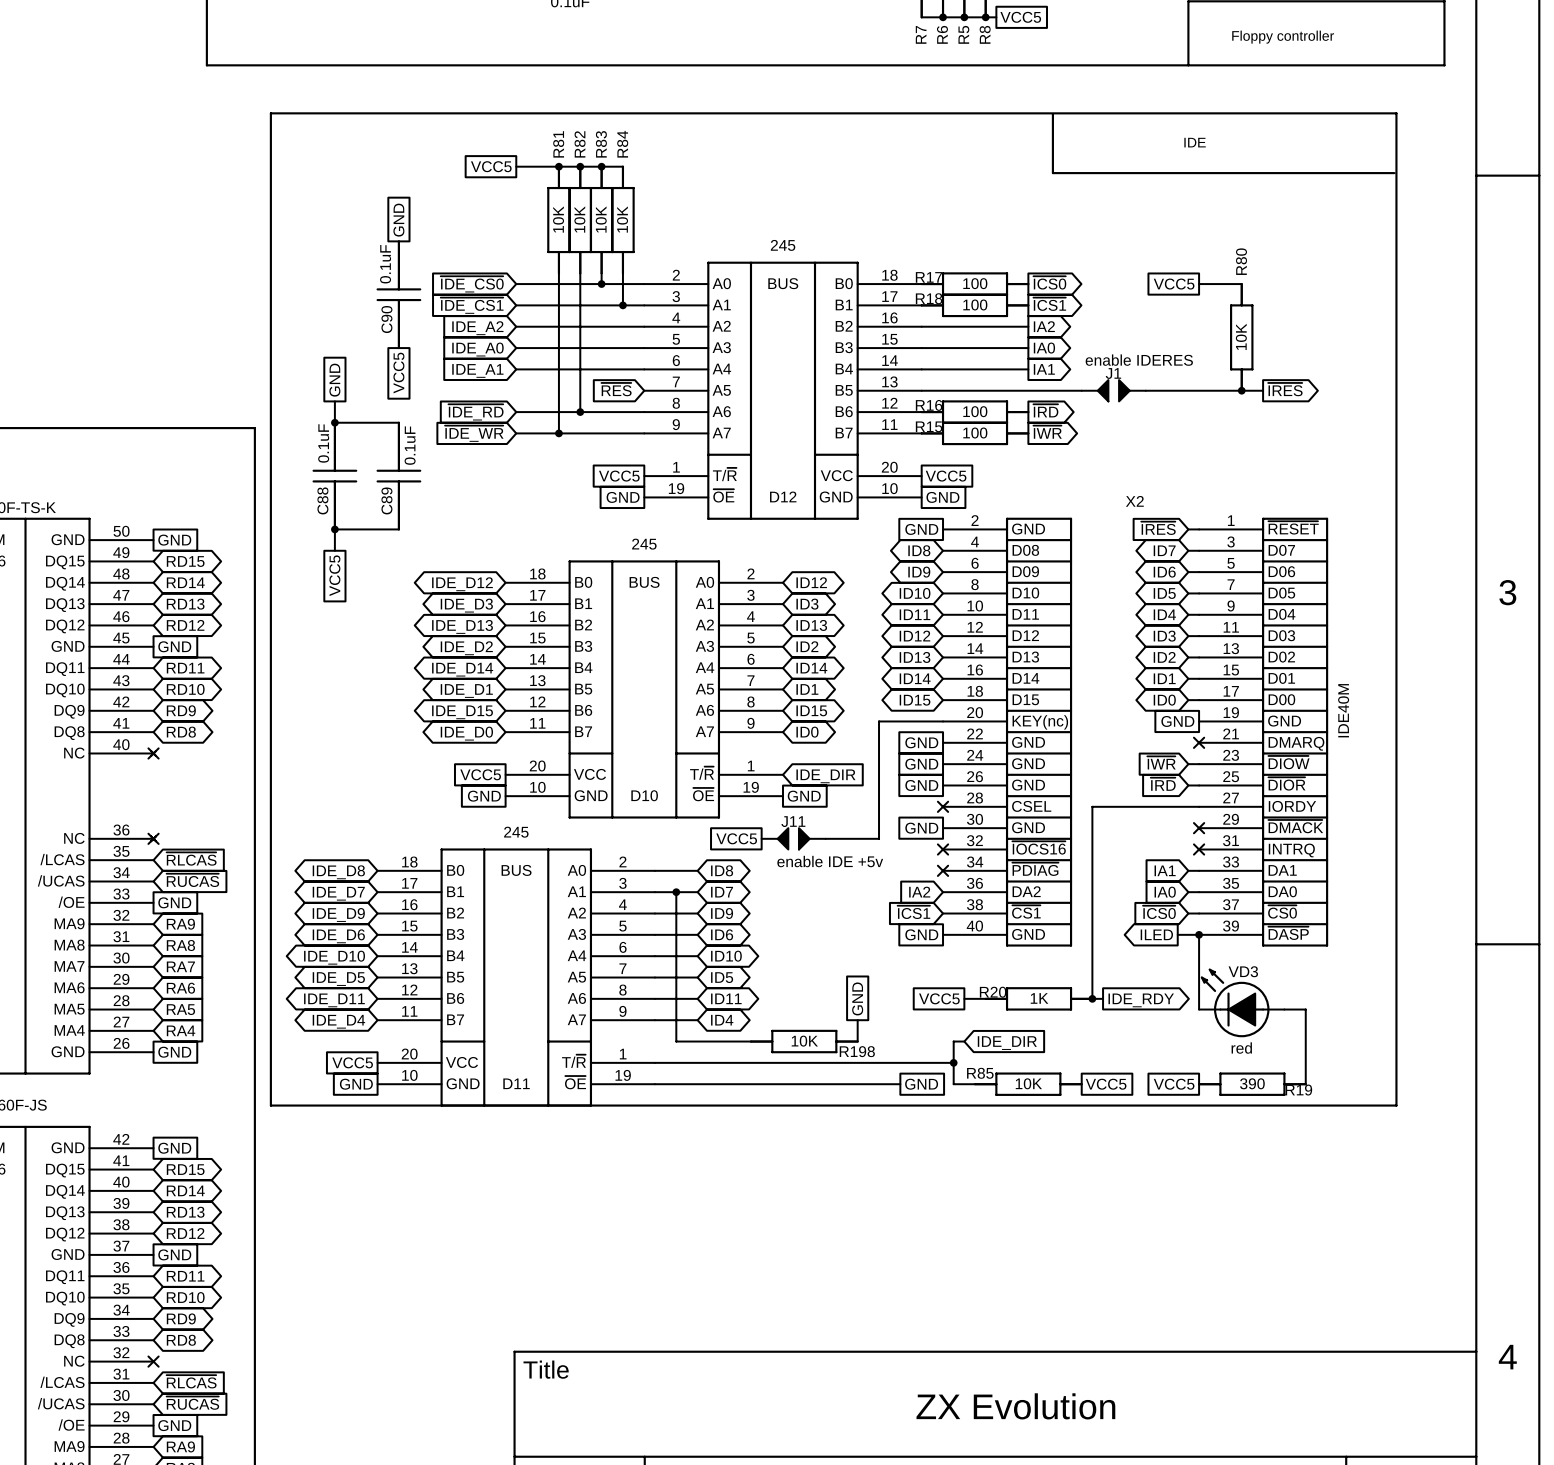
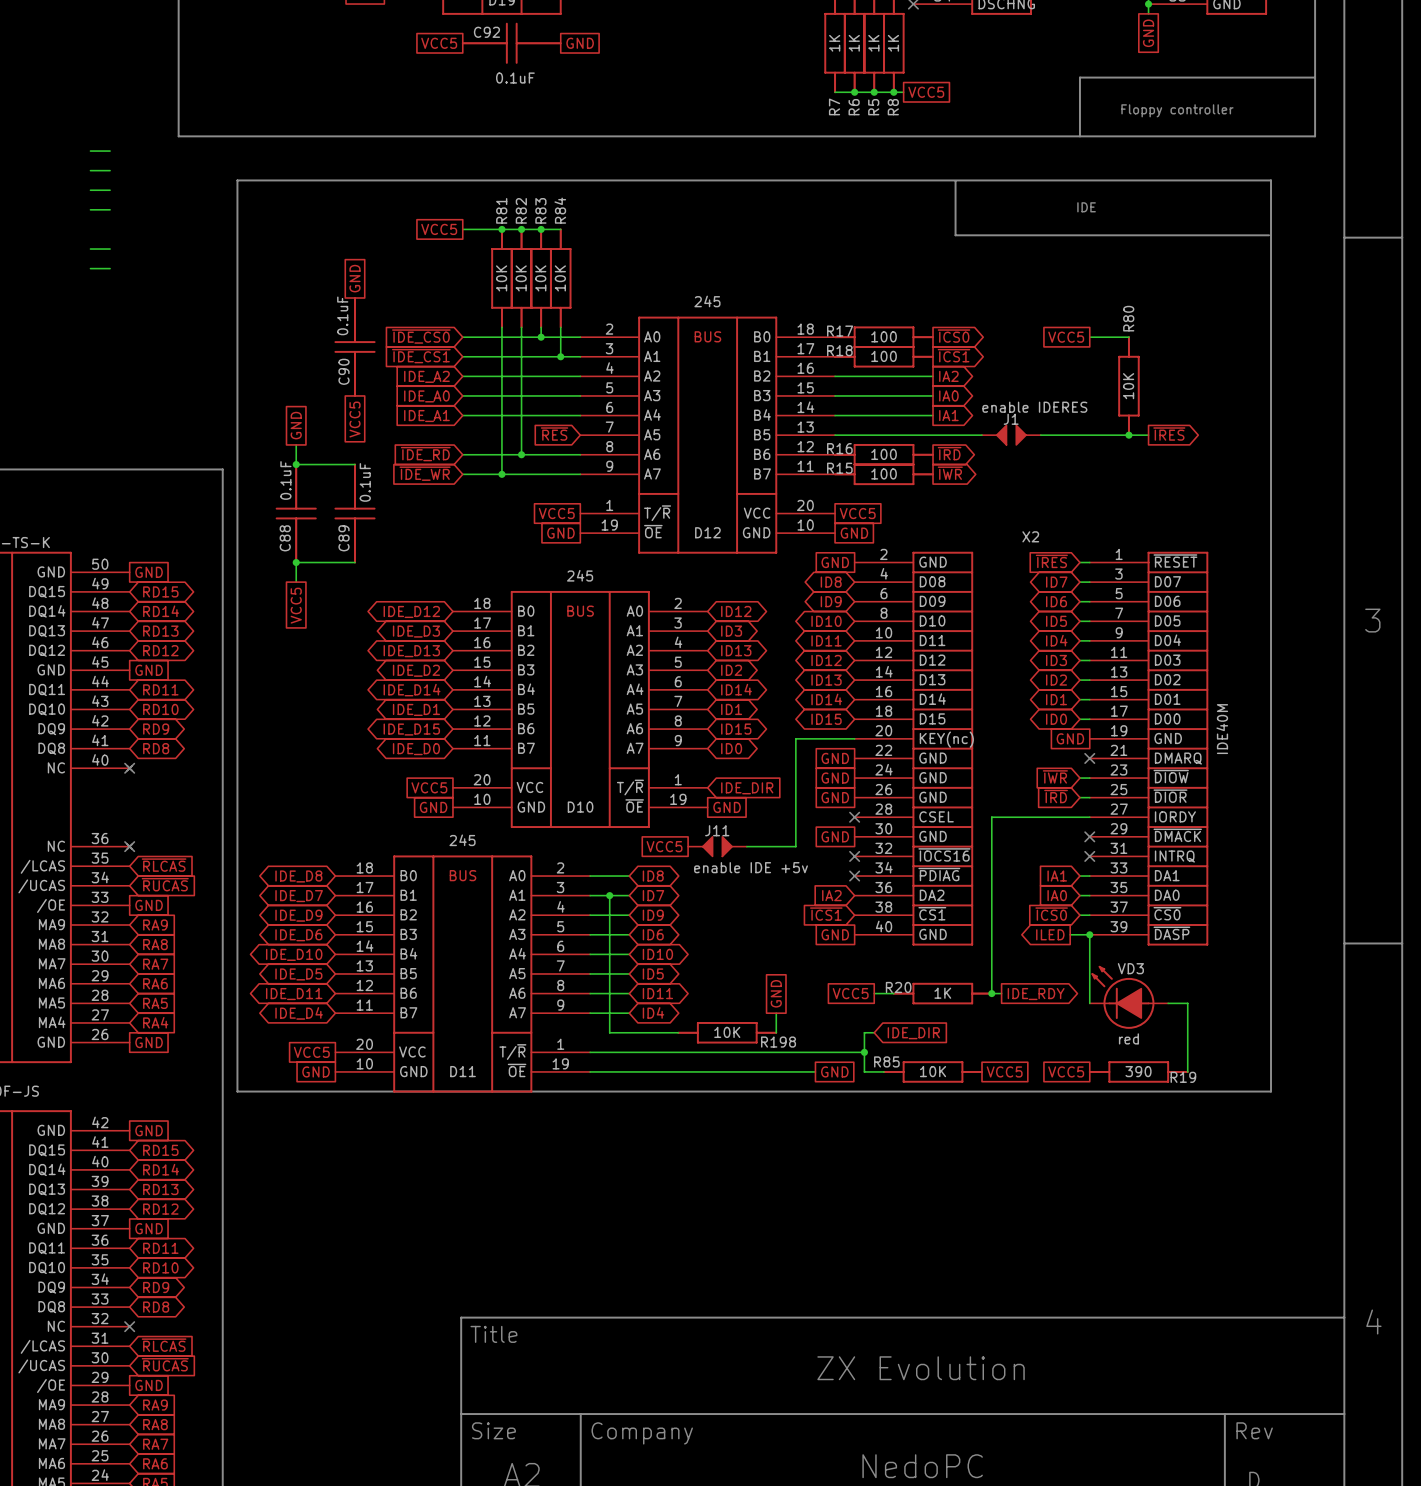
wire: none -> (90, 151) (110, 151)
wire: none -> (90, 170) (110, 170)
wire: none -> (90, 190) (110, 190)
wire: none -> (90, 209) (110, 209)
wire: none -> (90, 249) (110, 249)
wire: none -> (90, 268) (110, 268)

